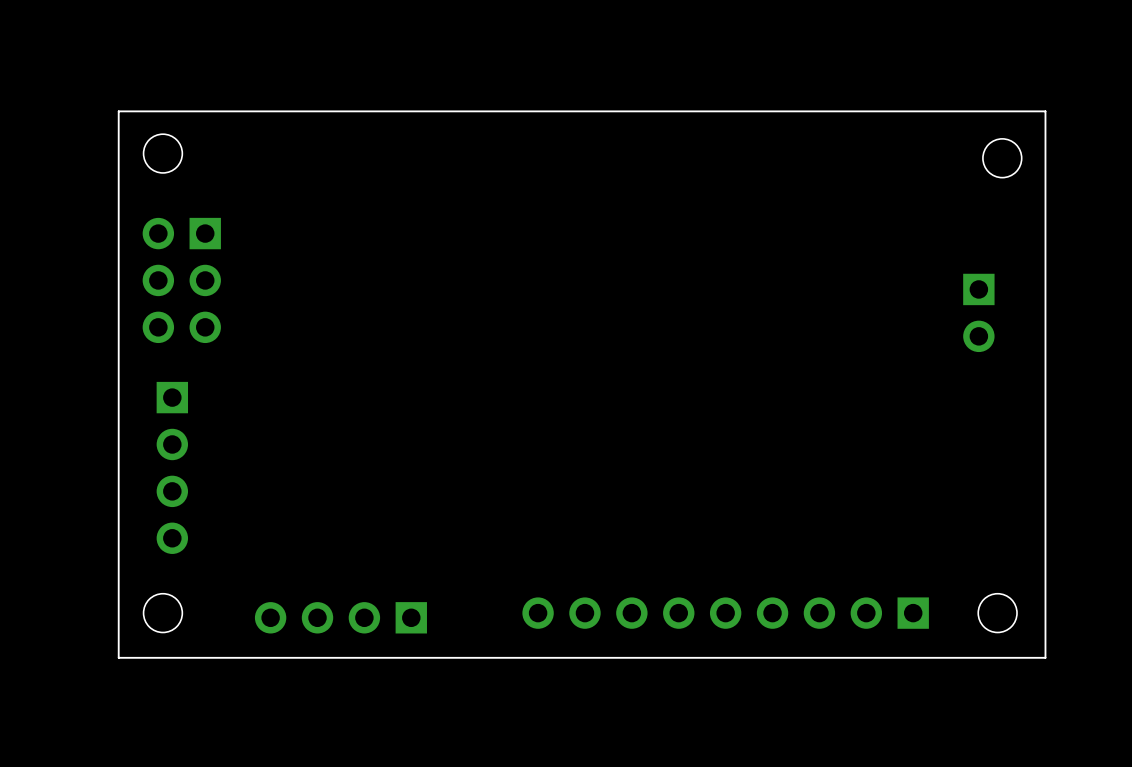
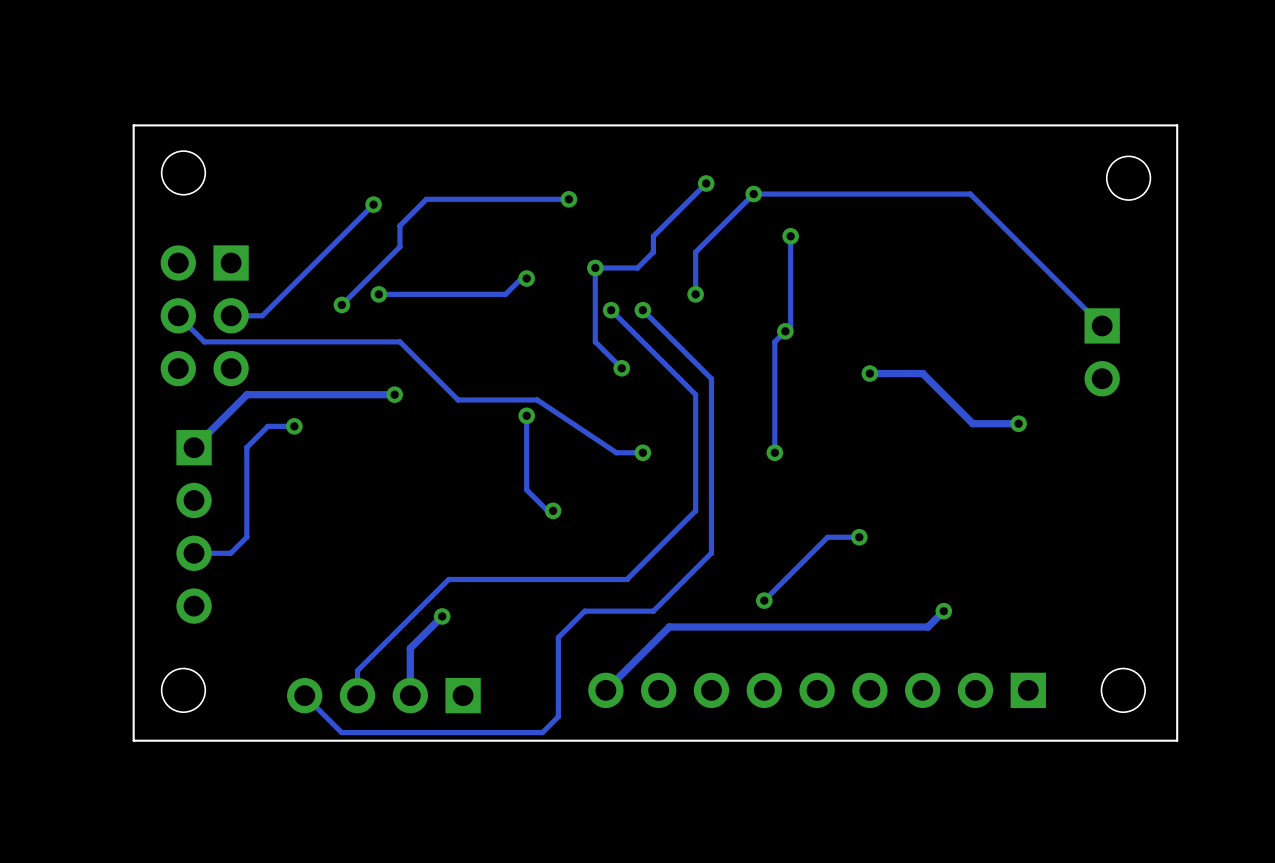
track: none -> (706, 183) (653, 236) (653, 252) (637, 267) (595, 267) (595, 341) (621, 368)
via: none -> (706, 183)
via: none -> (753, 194)
track: none -> (568, 199) (426, 199) (399, 225) (399, 246) (341, 304)
via: none -> (568, 199)
track: none -> (373, 204) (262, 315) (231, 315)
via: none -> (373, 204)
track: none -> (790, 236) (790, 326) (774, 341) (774, 452)
via: none -> (790, 236)
via: none -> (595, 267)
track: none -> (526, 278) (521, 278) (505, 294) (378, 294)
via: none -> (526, 278)
via: none -> (378, 294)
track: none -> (695, 294) (695, 252) (753, 194) (970, 194) (1102, 325)
via: none -> (695, 294)
via: none -> (341, 304)
track: none -> (611, 310) (695, 394) (695, 510) (627, 579) (448, 579) (357, 670) (357, 695)
via: none -> (611, 310)
track: none -> (642, 310) (711, 378) (711, 553) (653, 611) (584, 611) (558, 637) (558, 716) (542, 732) (341, 732) (304, 695)
via: none -> (642, 310)
track: none -> (178, 315) (204, 341) (399, 341) (458, 399) (537, 399) (616, 452) (642, 452)
via: none -> (785, 331)
via: none -> (621, 368)
track: none -> (869, 373) (922, 373) (972, 423) (1018, 423)
via: none -> (869, 373)
track: none -> (394, 394) (247, 394) (194, 447)
via: none -> (394, 394)
track: none -> (526, 415) (526, 489) (547, 510) (553, 510)
via: none -> (526, 415)
via: none -> (1018, 423)
track: none -> (294, 426) (267, 426) (246, 447) (246, 537) (230, 553) (194, 553)
via: none -> (294, 426)
via: none -> (642, 452)
via: none -> (774, 452)
via: none -> (553, 510)
track: none -> (859, 537) (827, 537) (764, 600)
via: none -> (859, 537)
via: none -> (764, 600)
track: none -> (943, 611) (927, 627) (669, 627) (605, 690)
via: none -> (943, 611)
track: none -> (442, 616) (410, 648) (410, 695)
via: none -> (442, 616)

